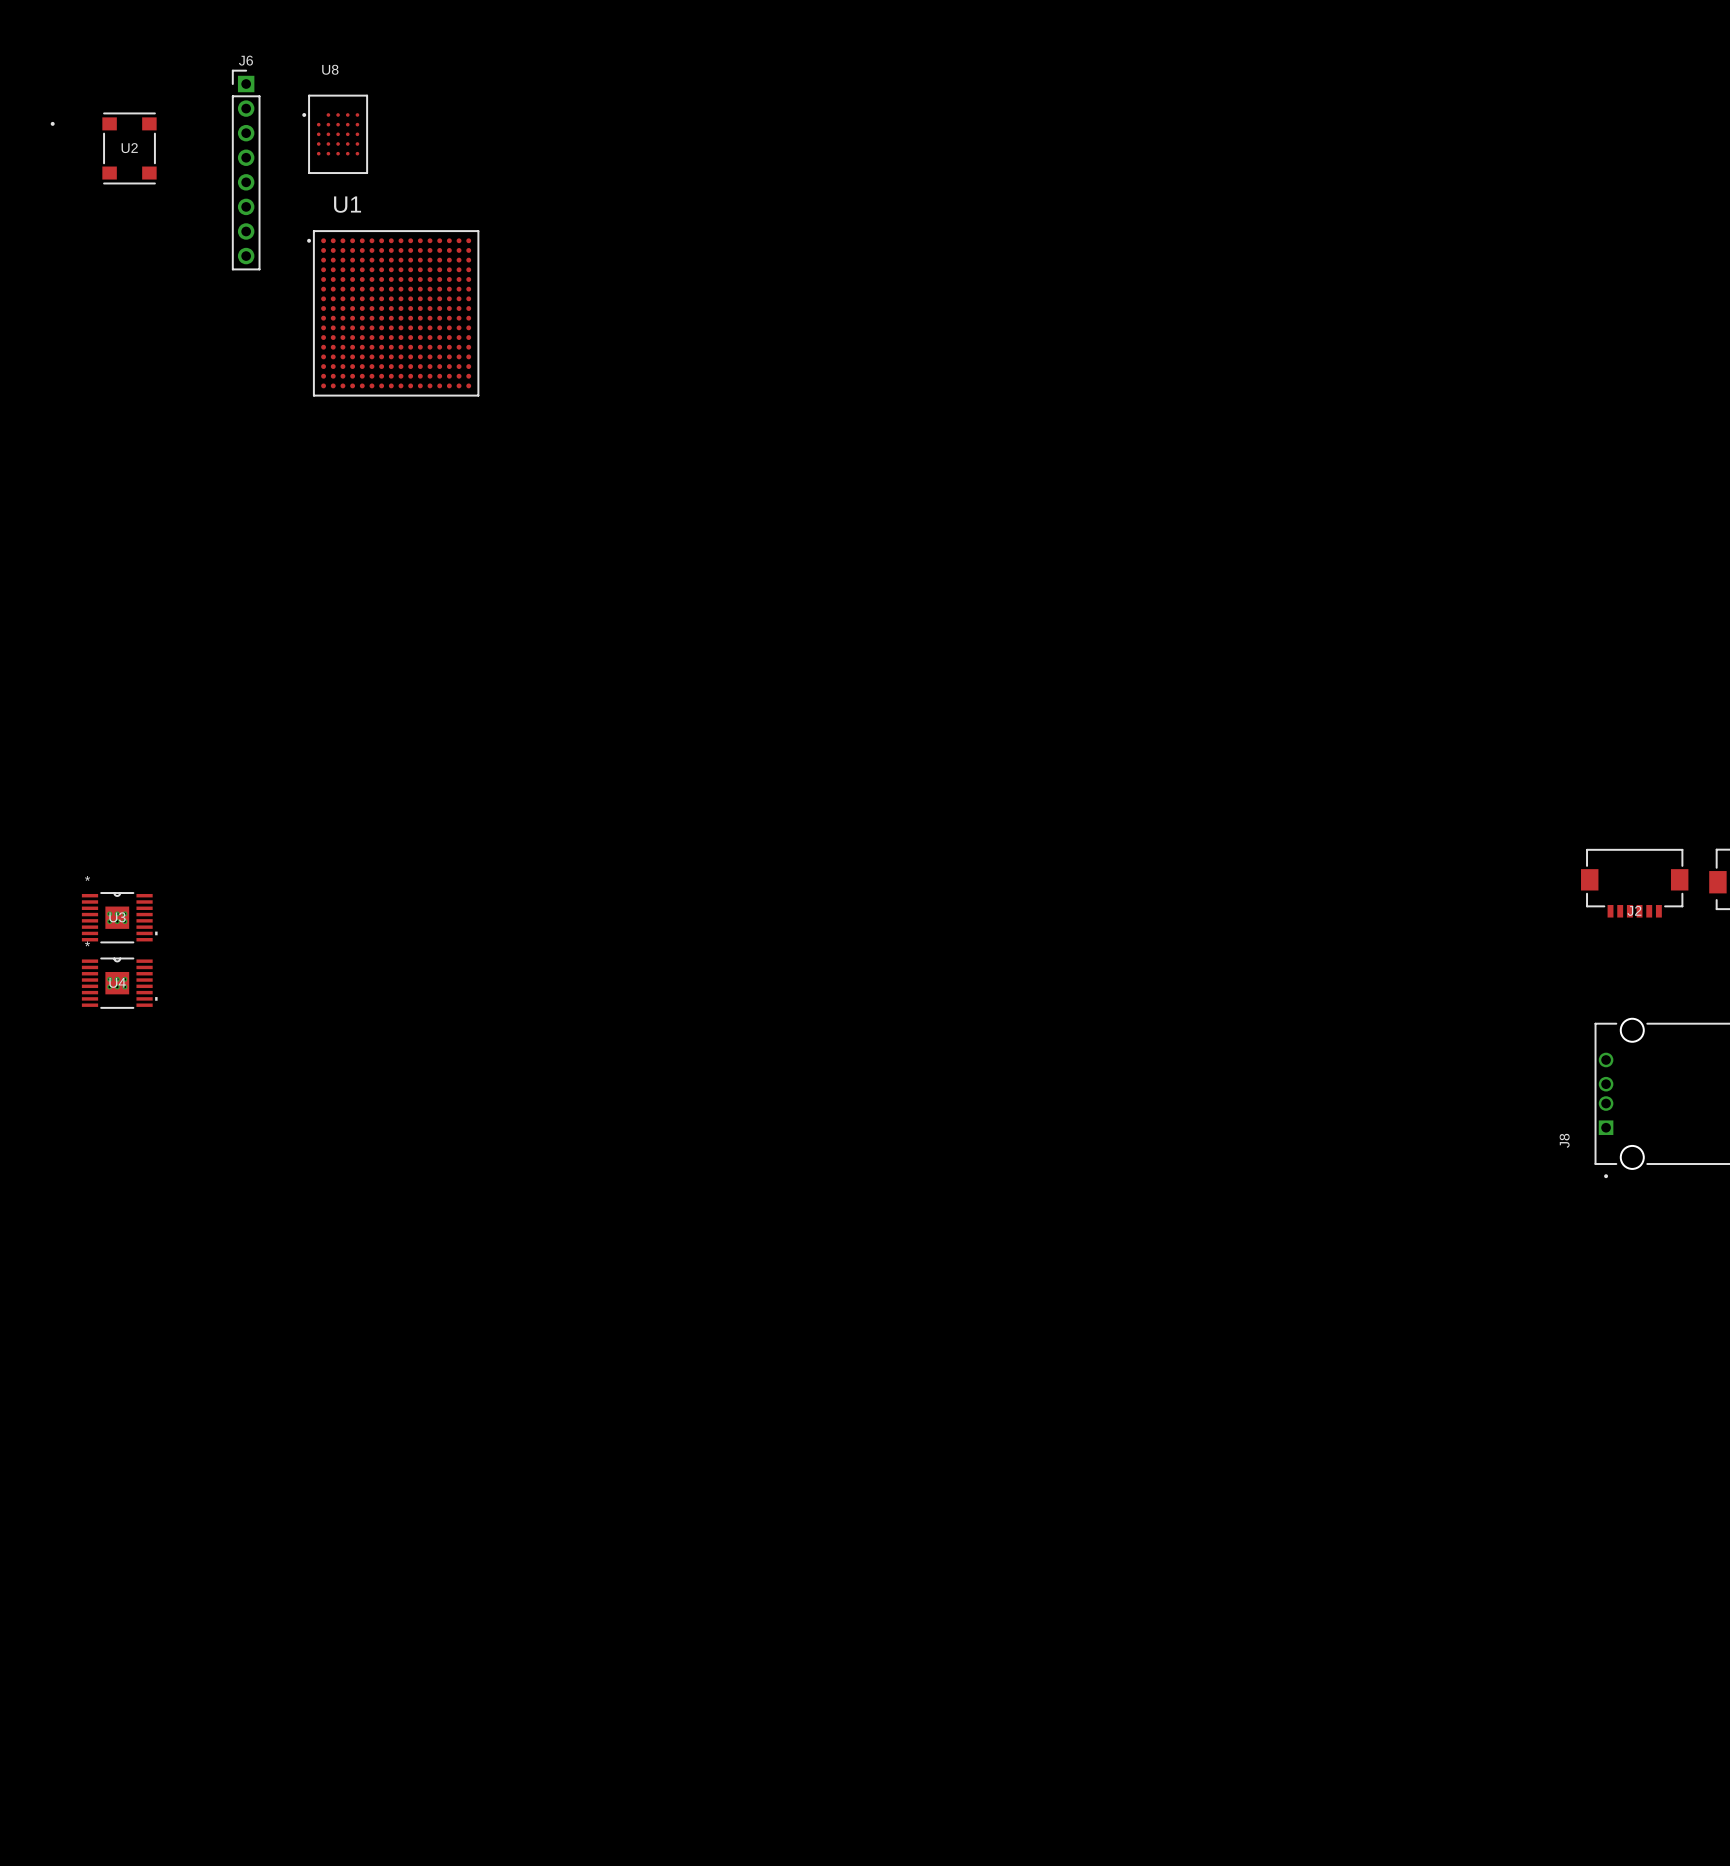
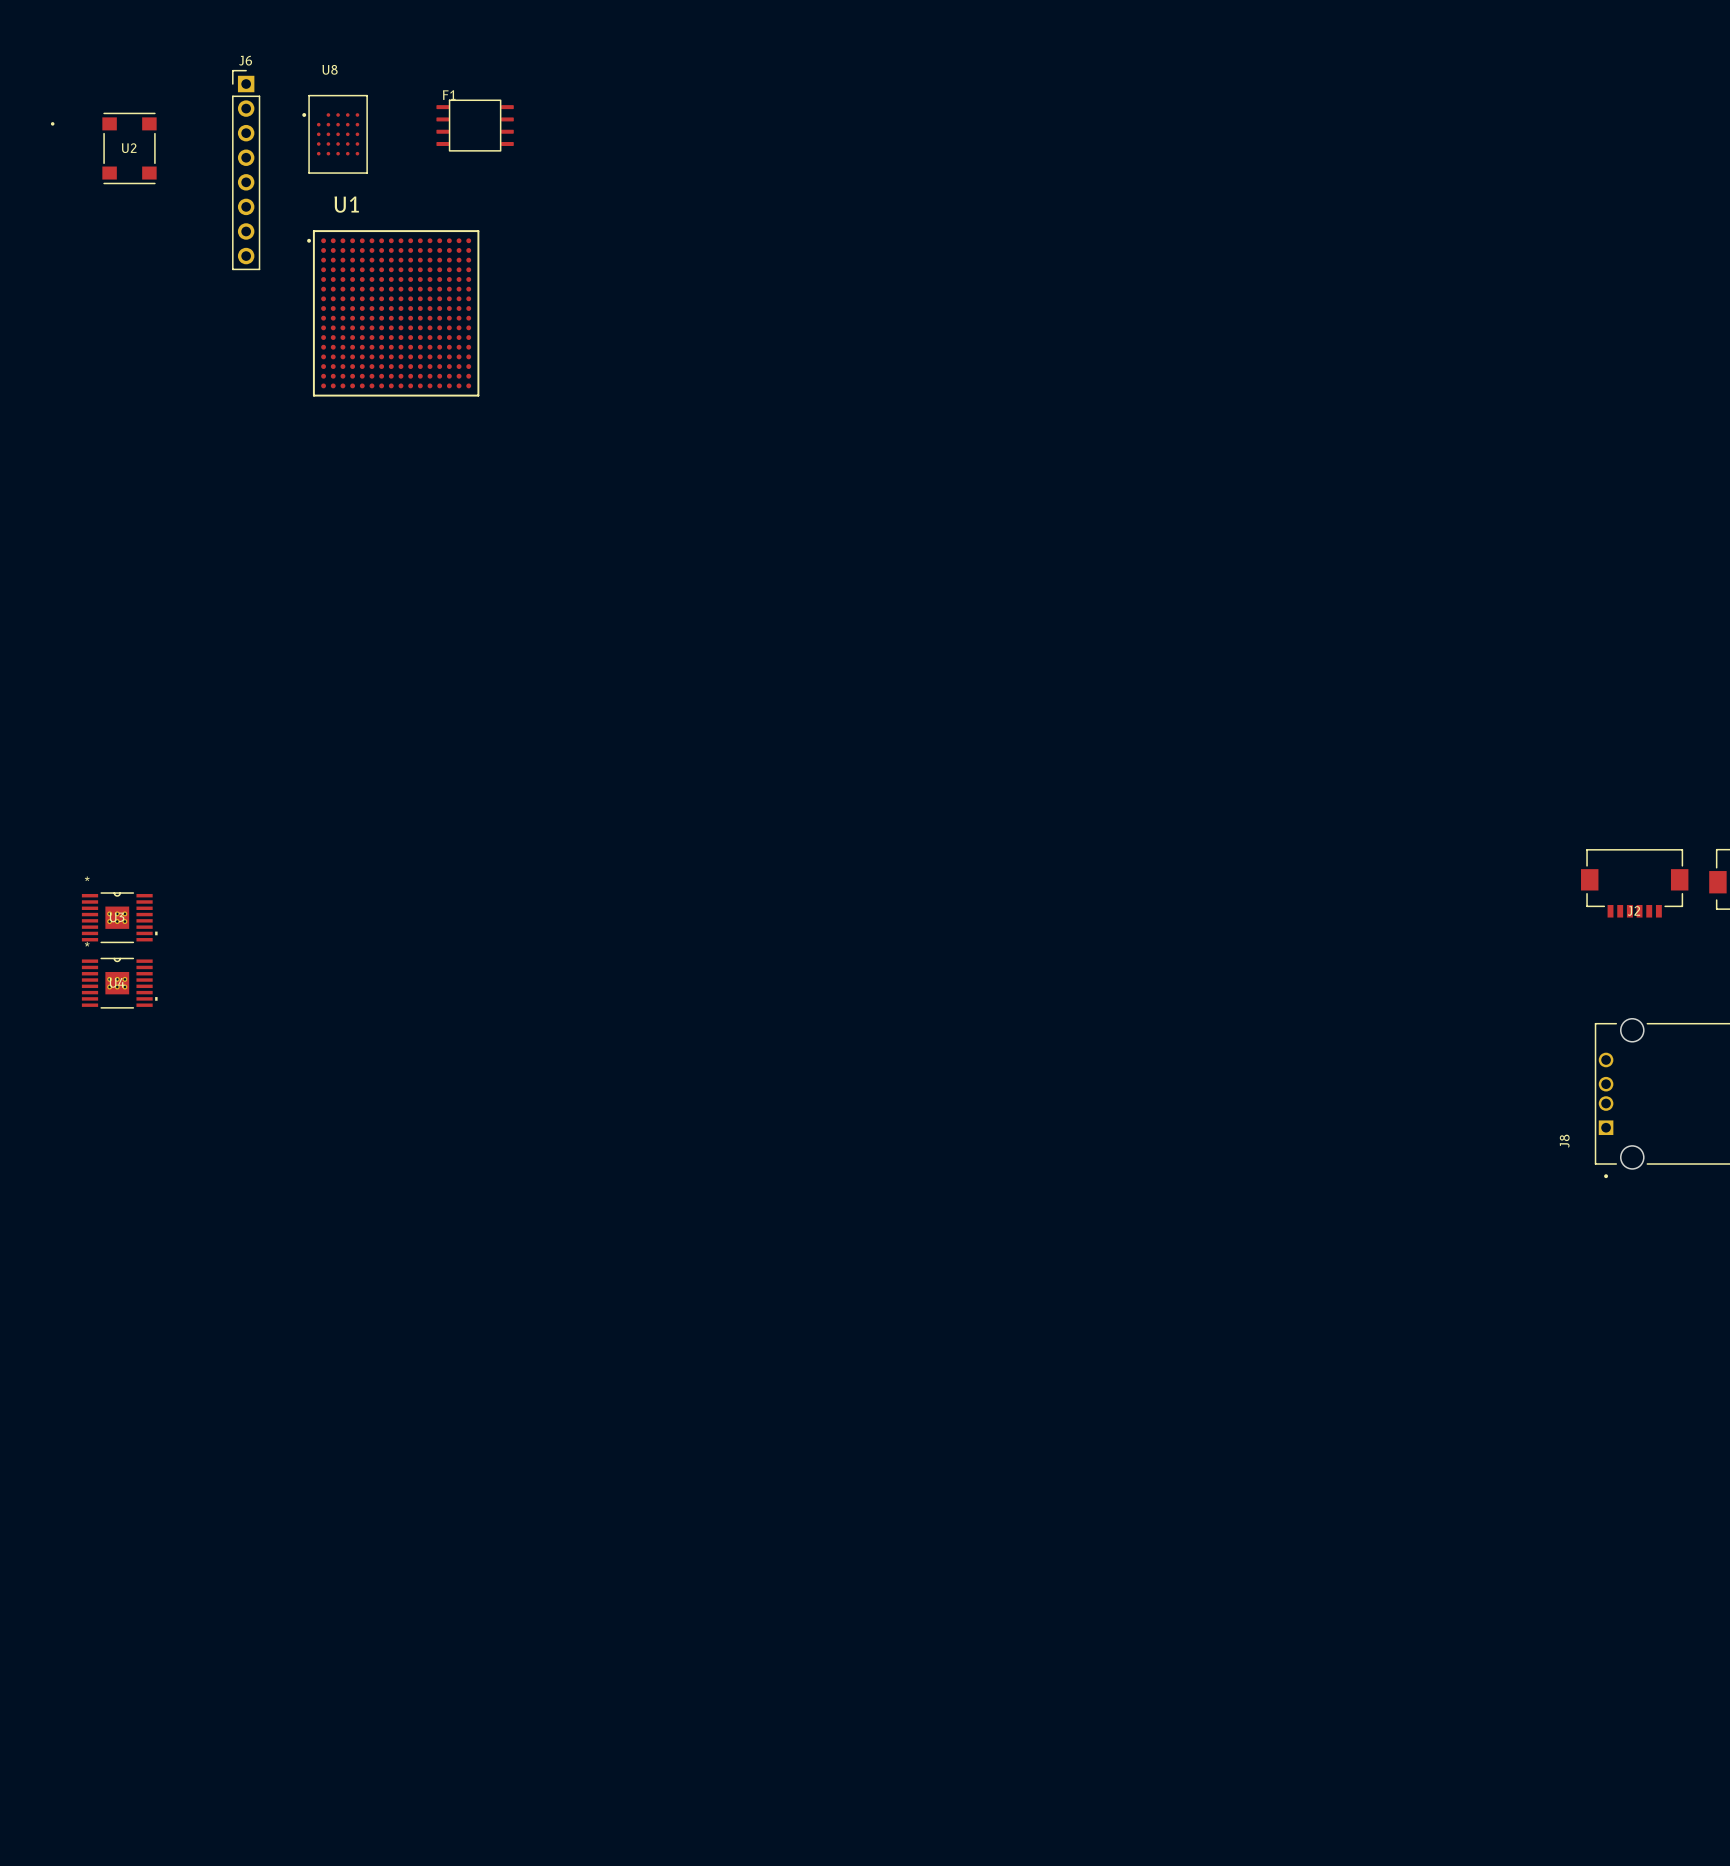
F1: none -> (475, 125)

